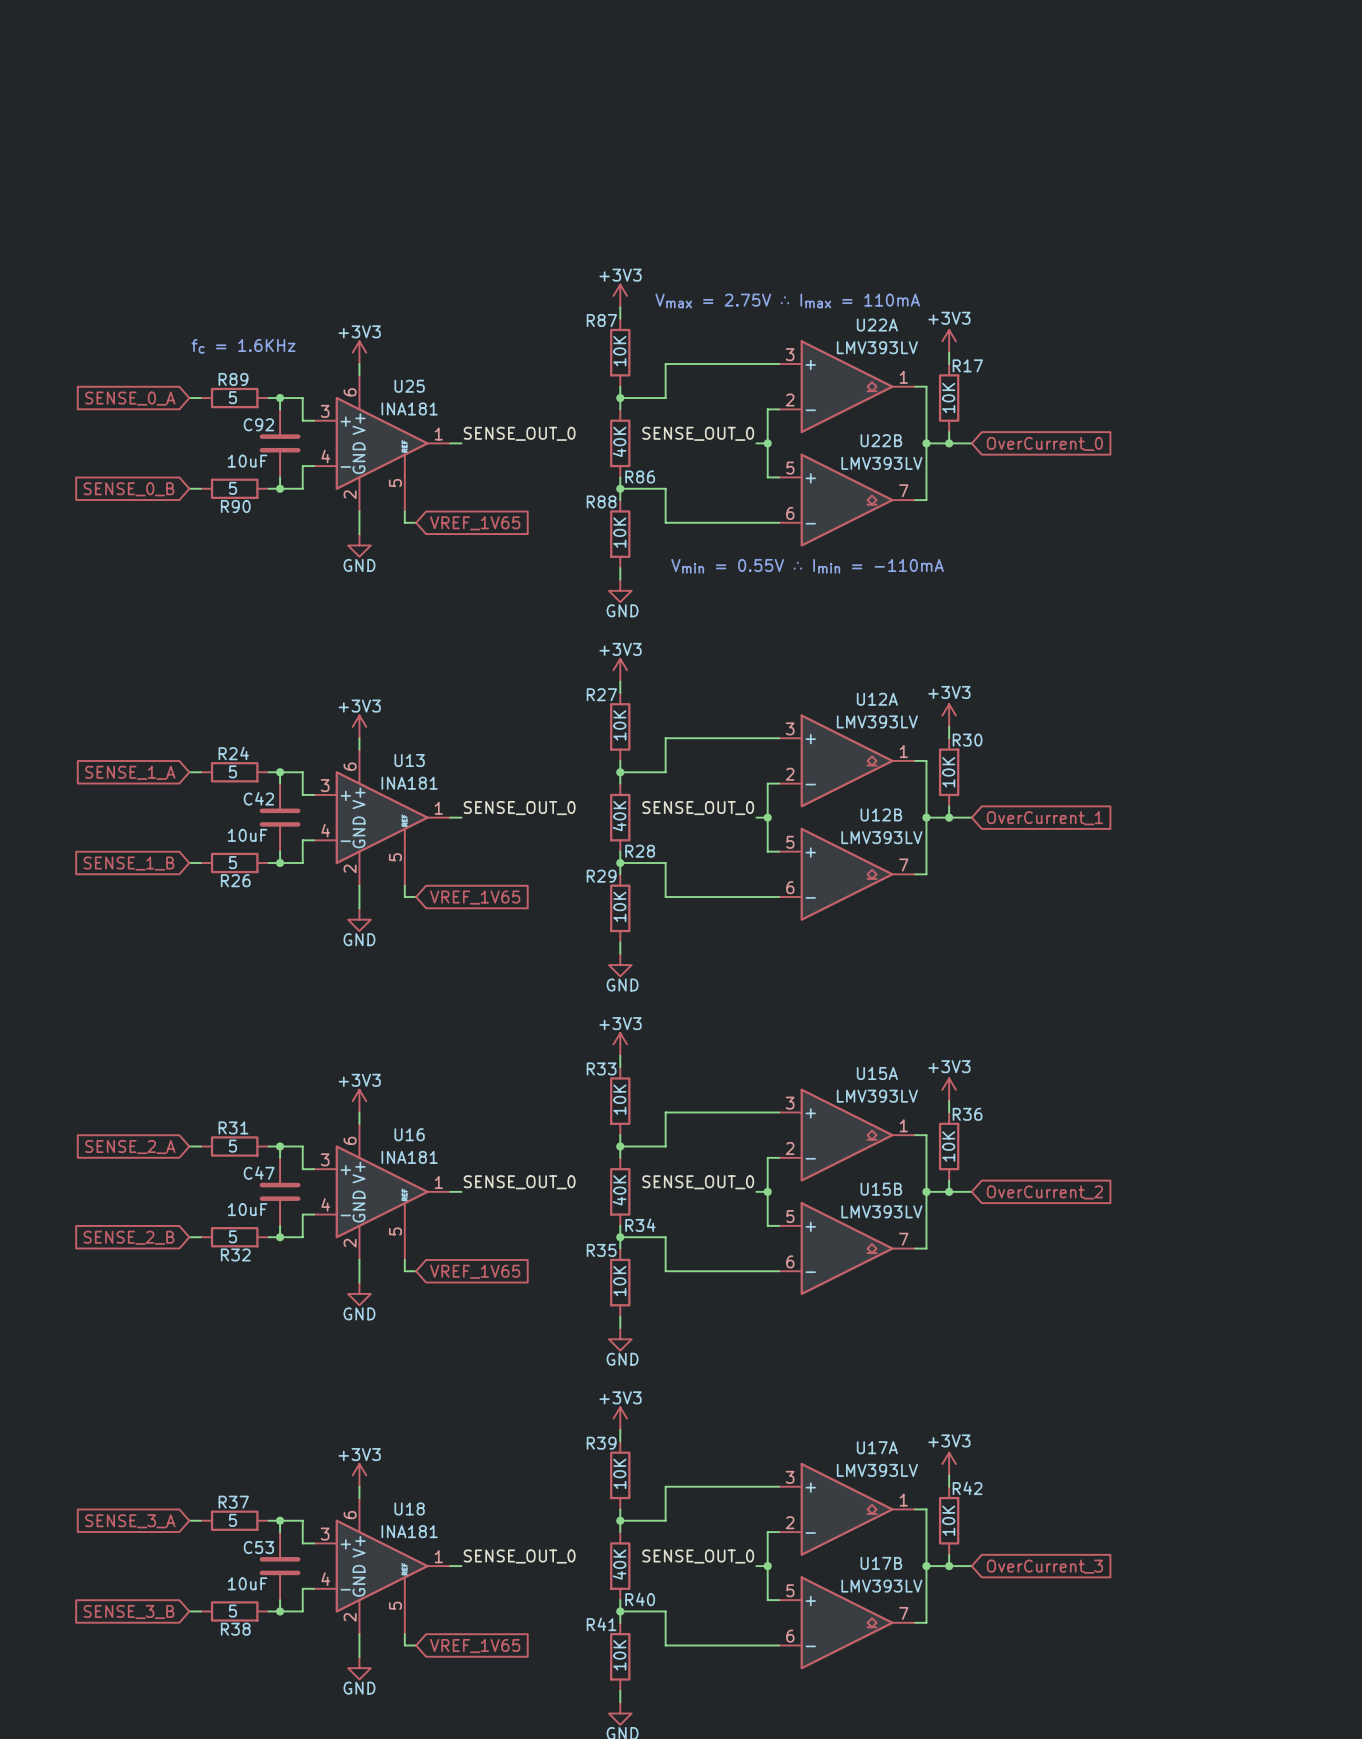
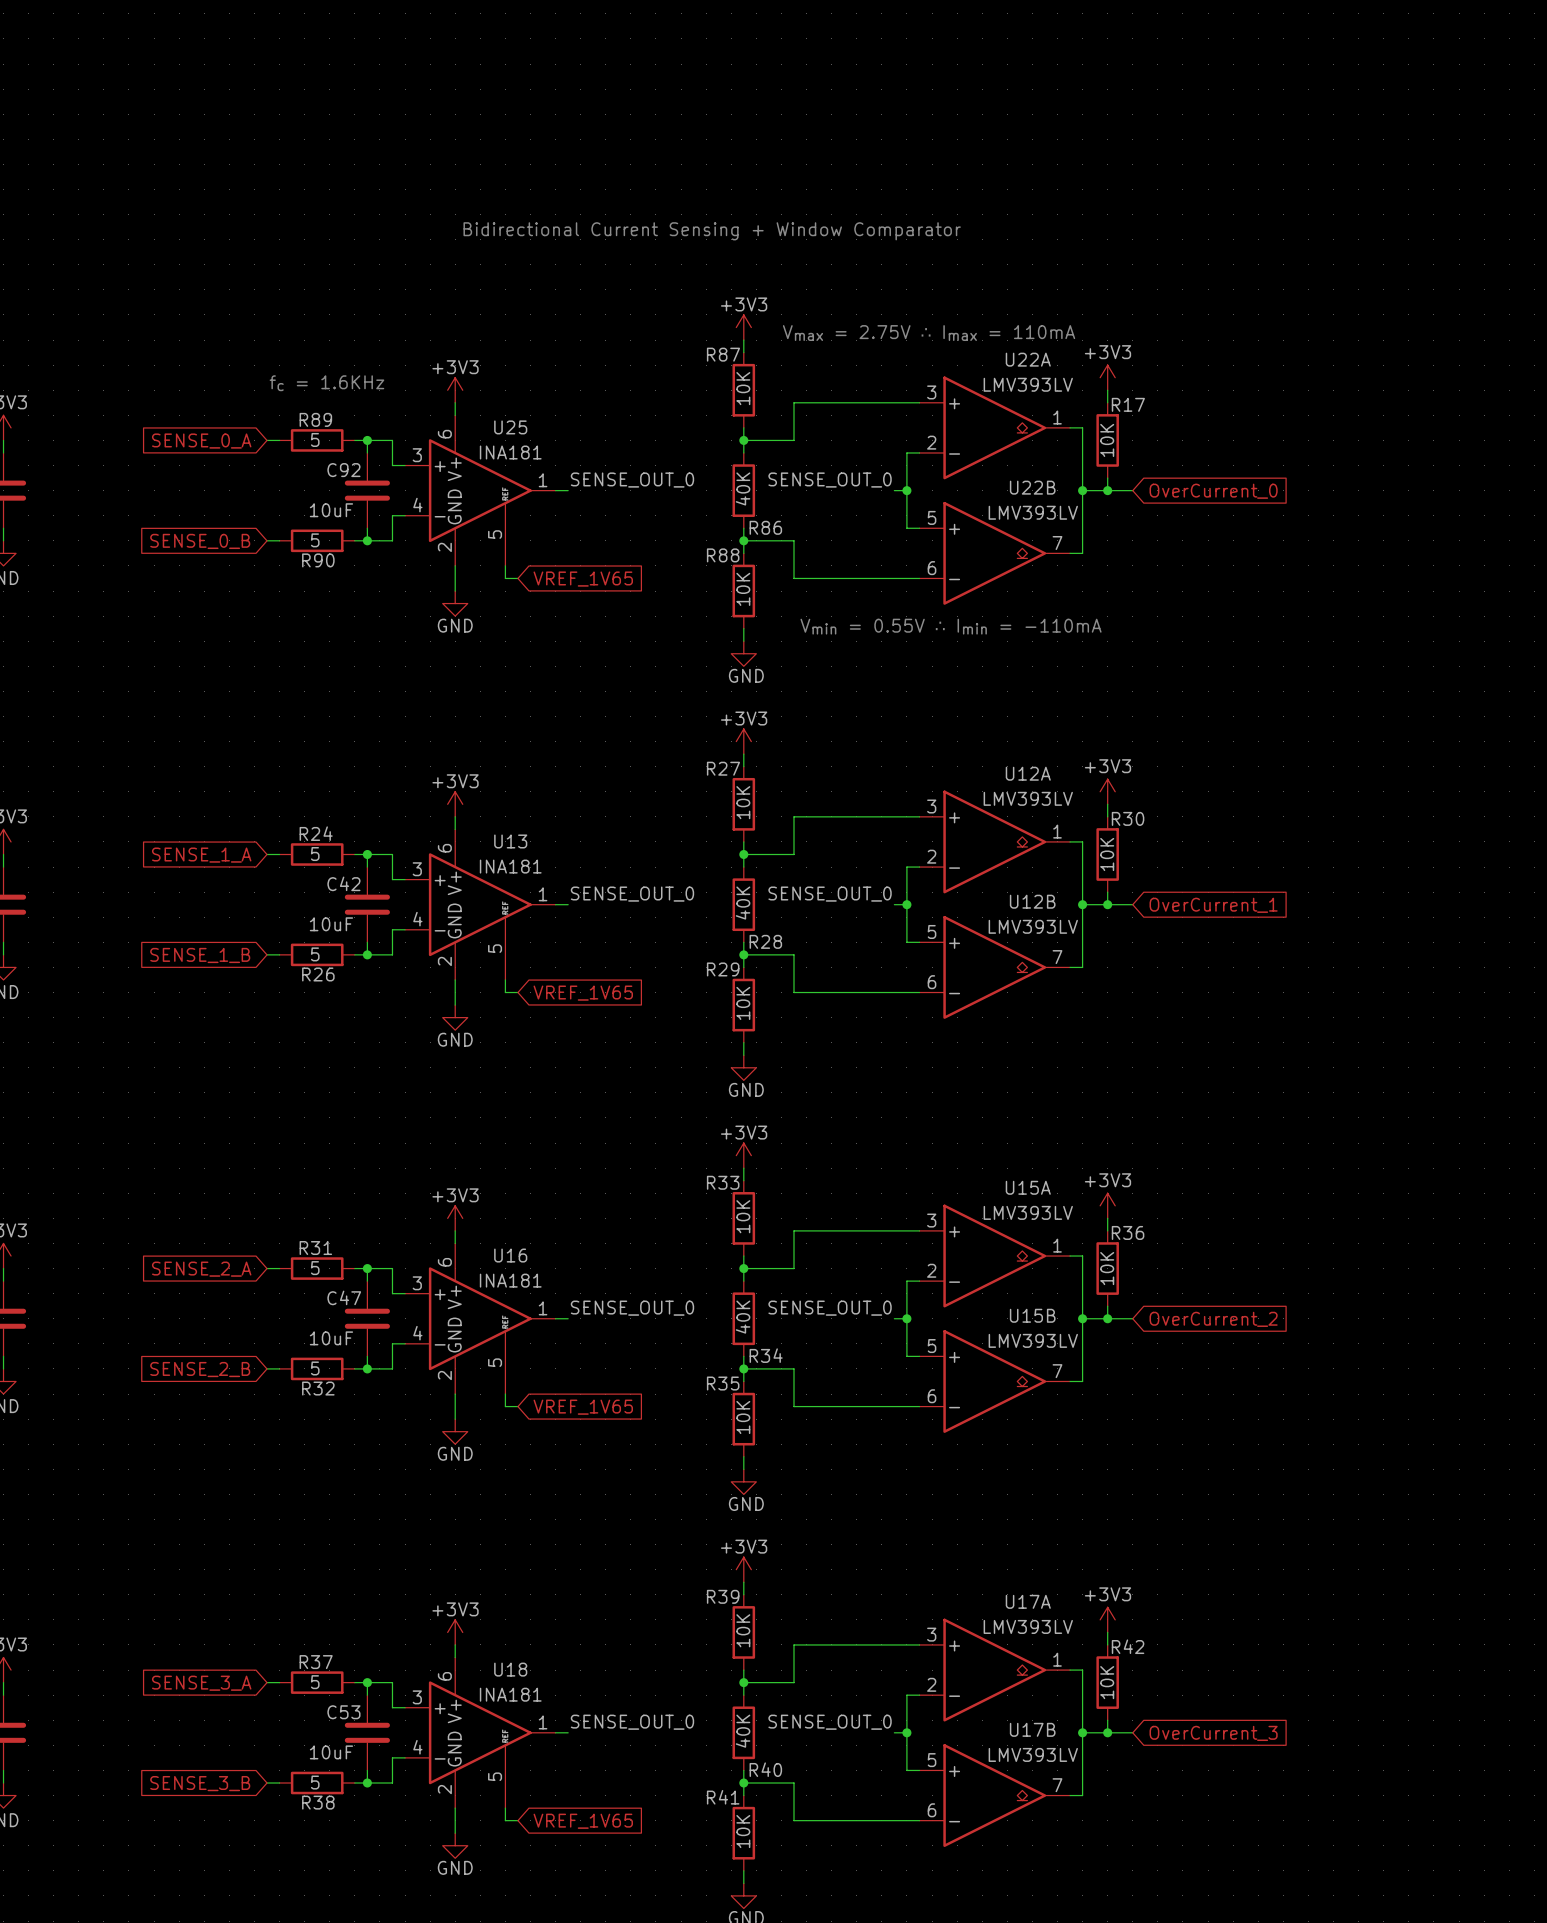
text: none -> Bidirectional Current Sensing + Window Comparator (712, 231)

